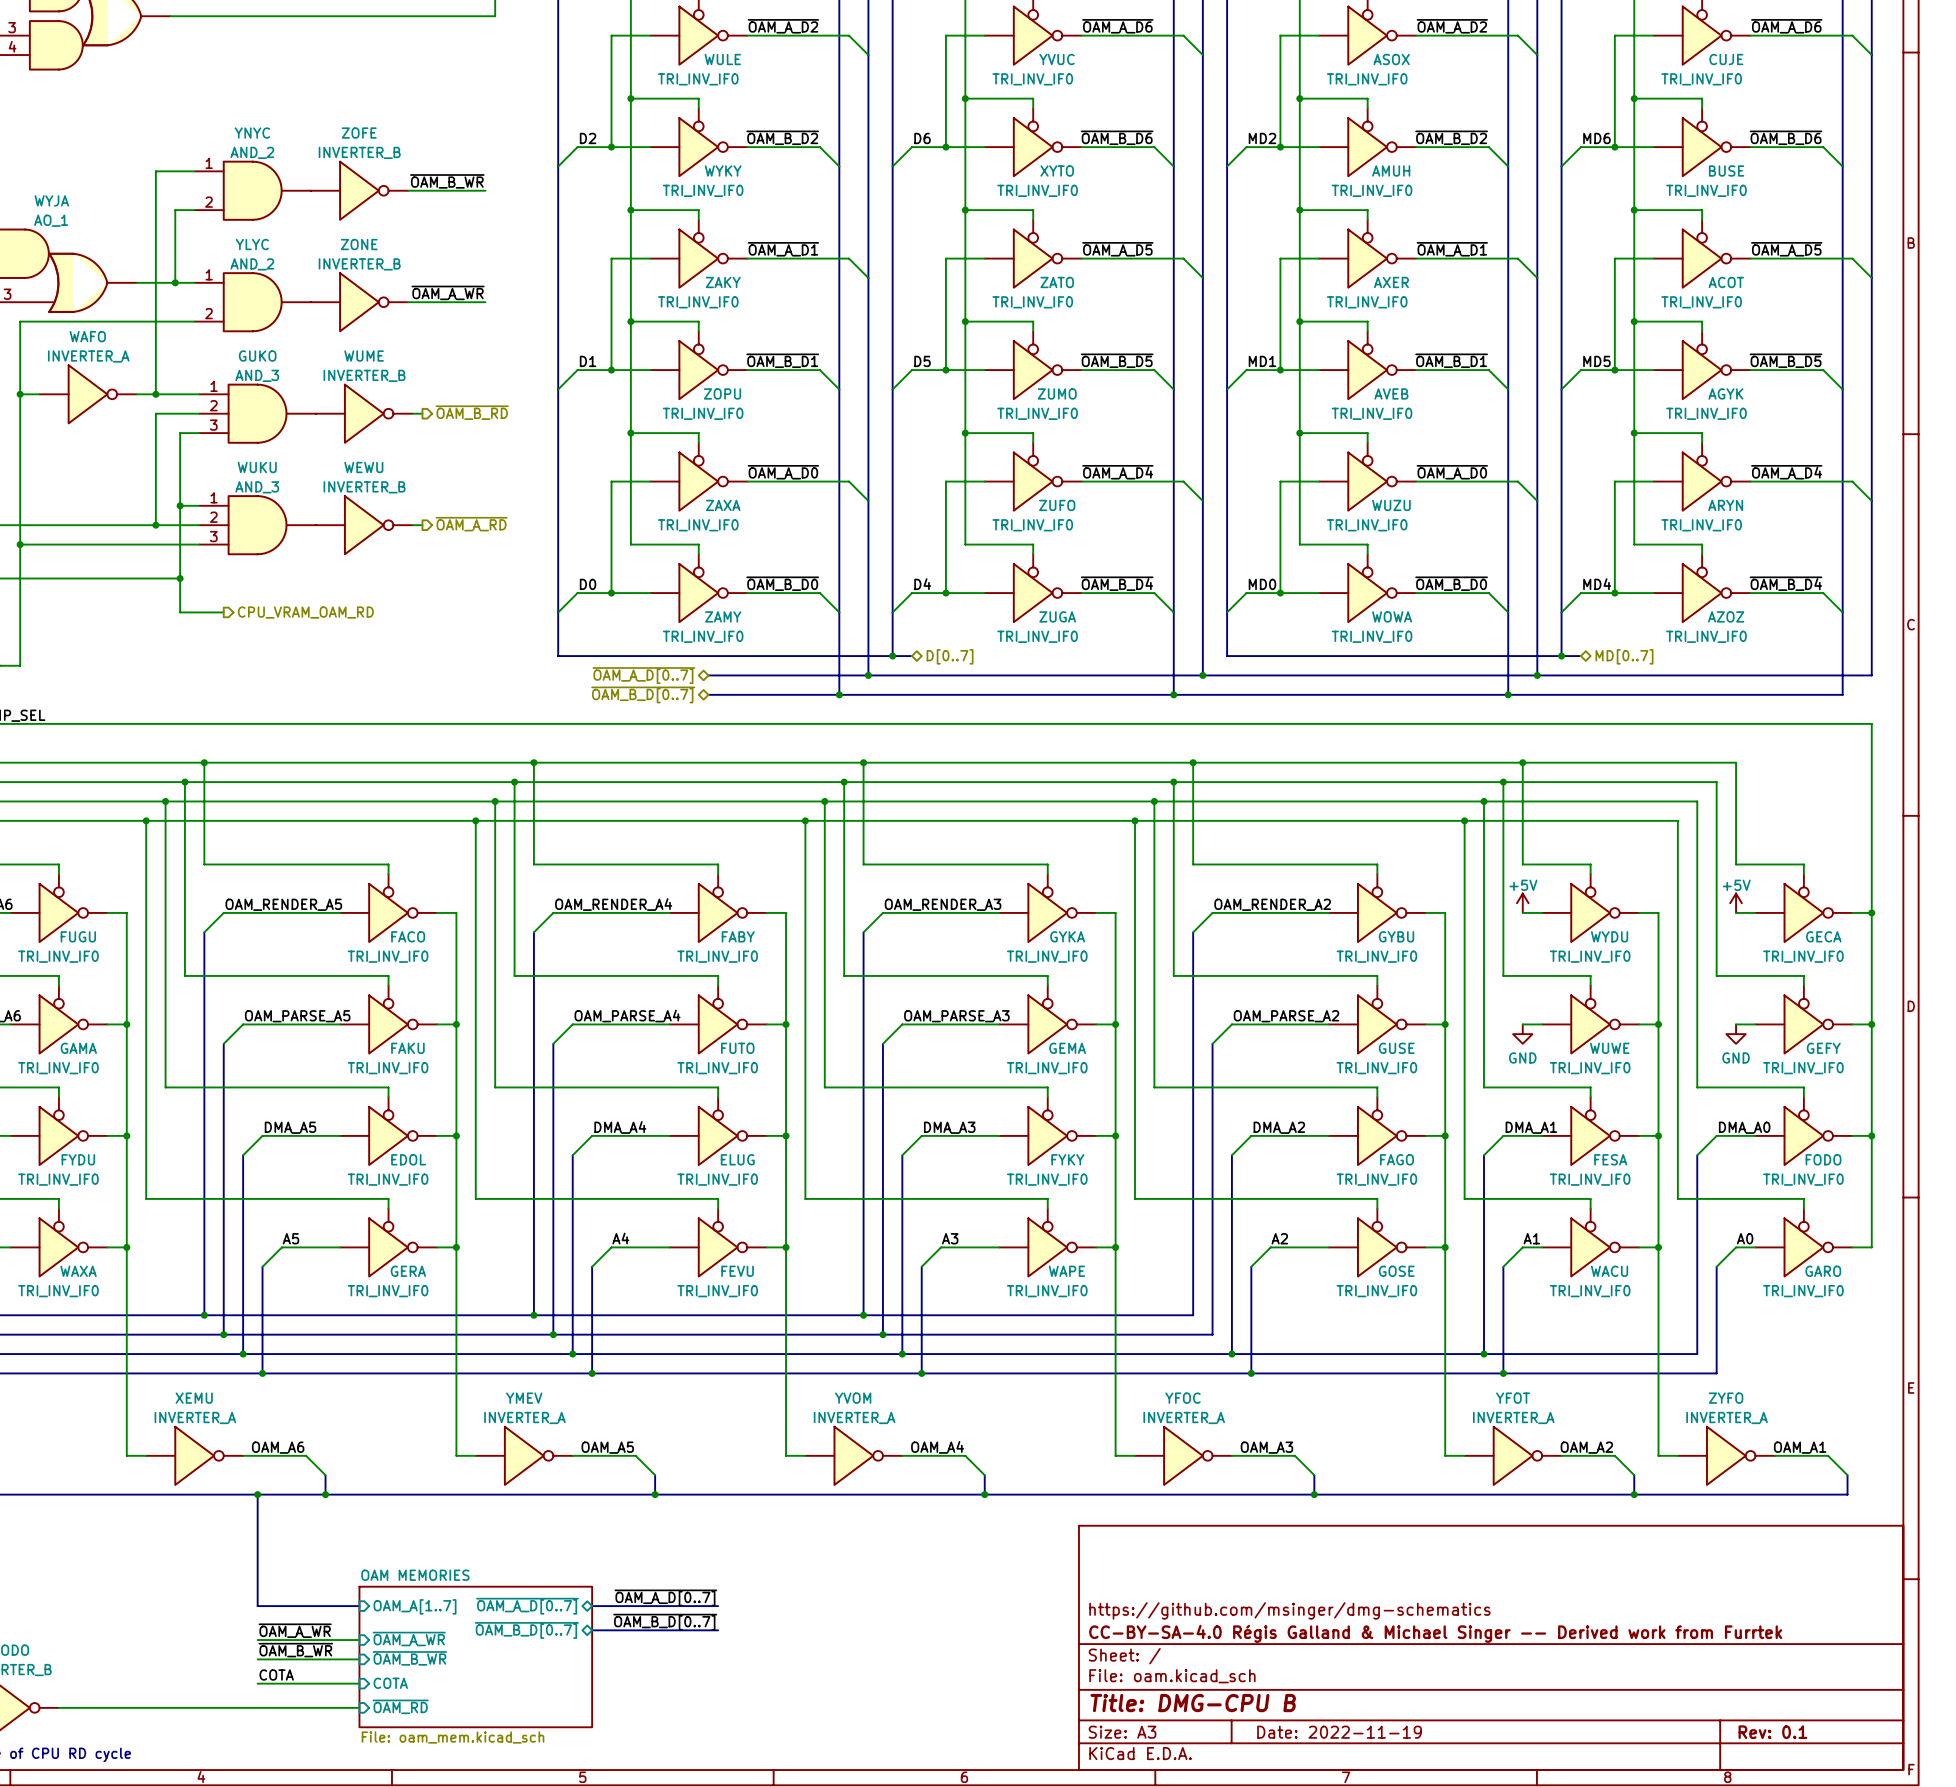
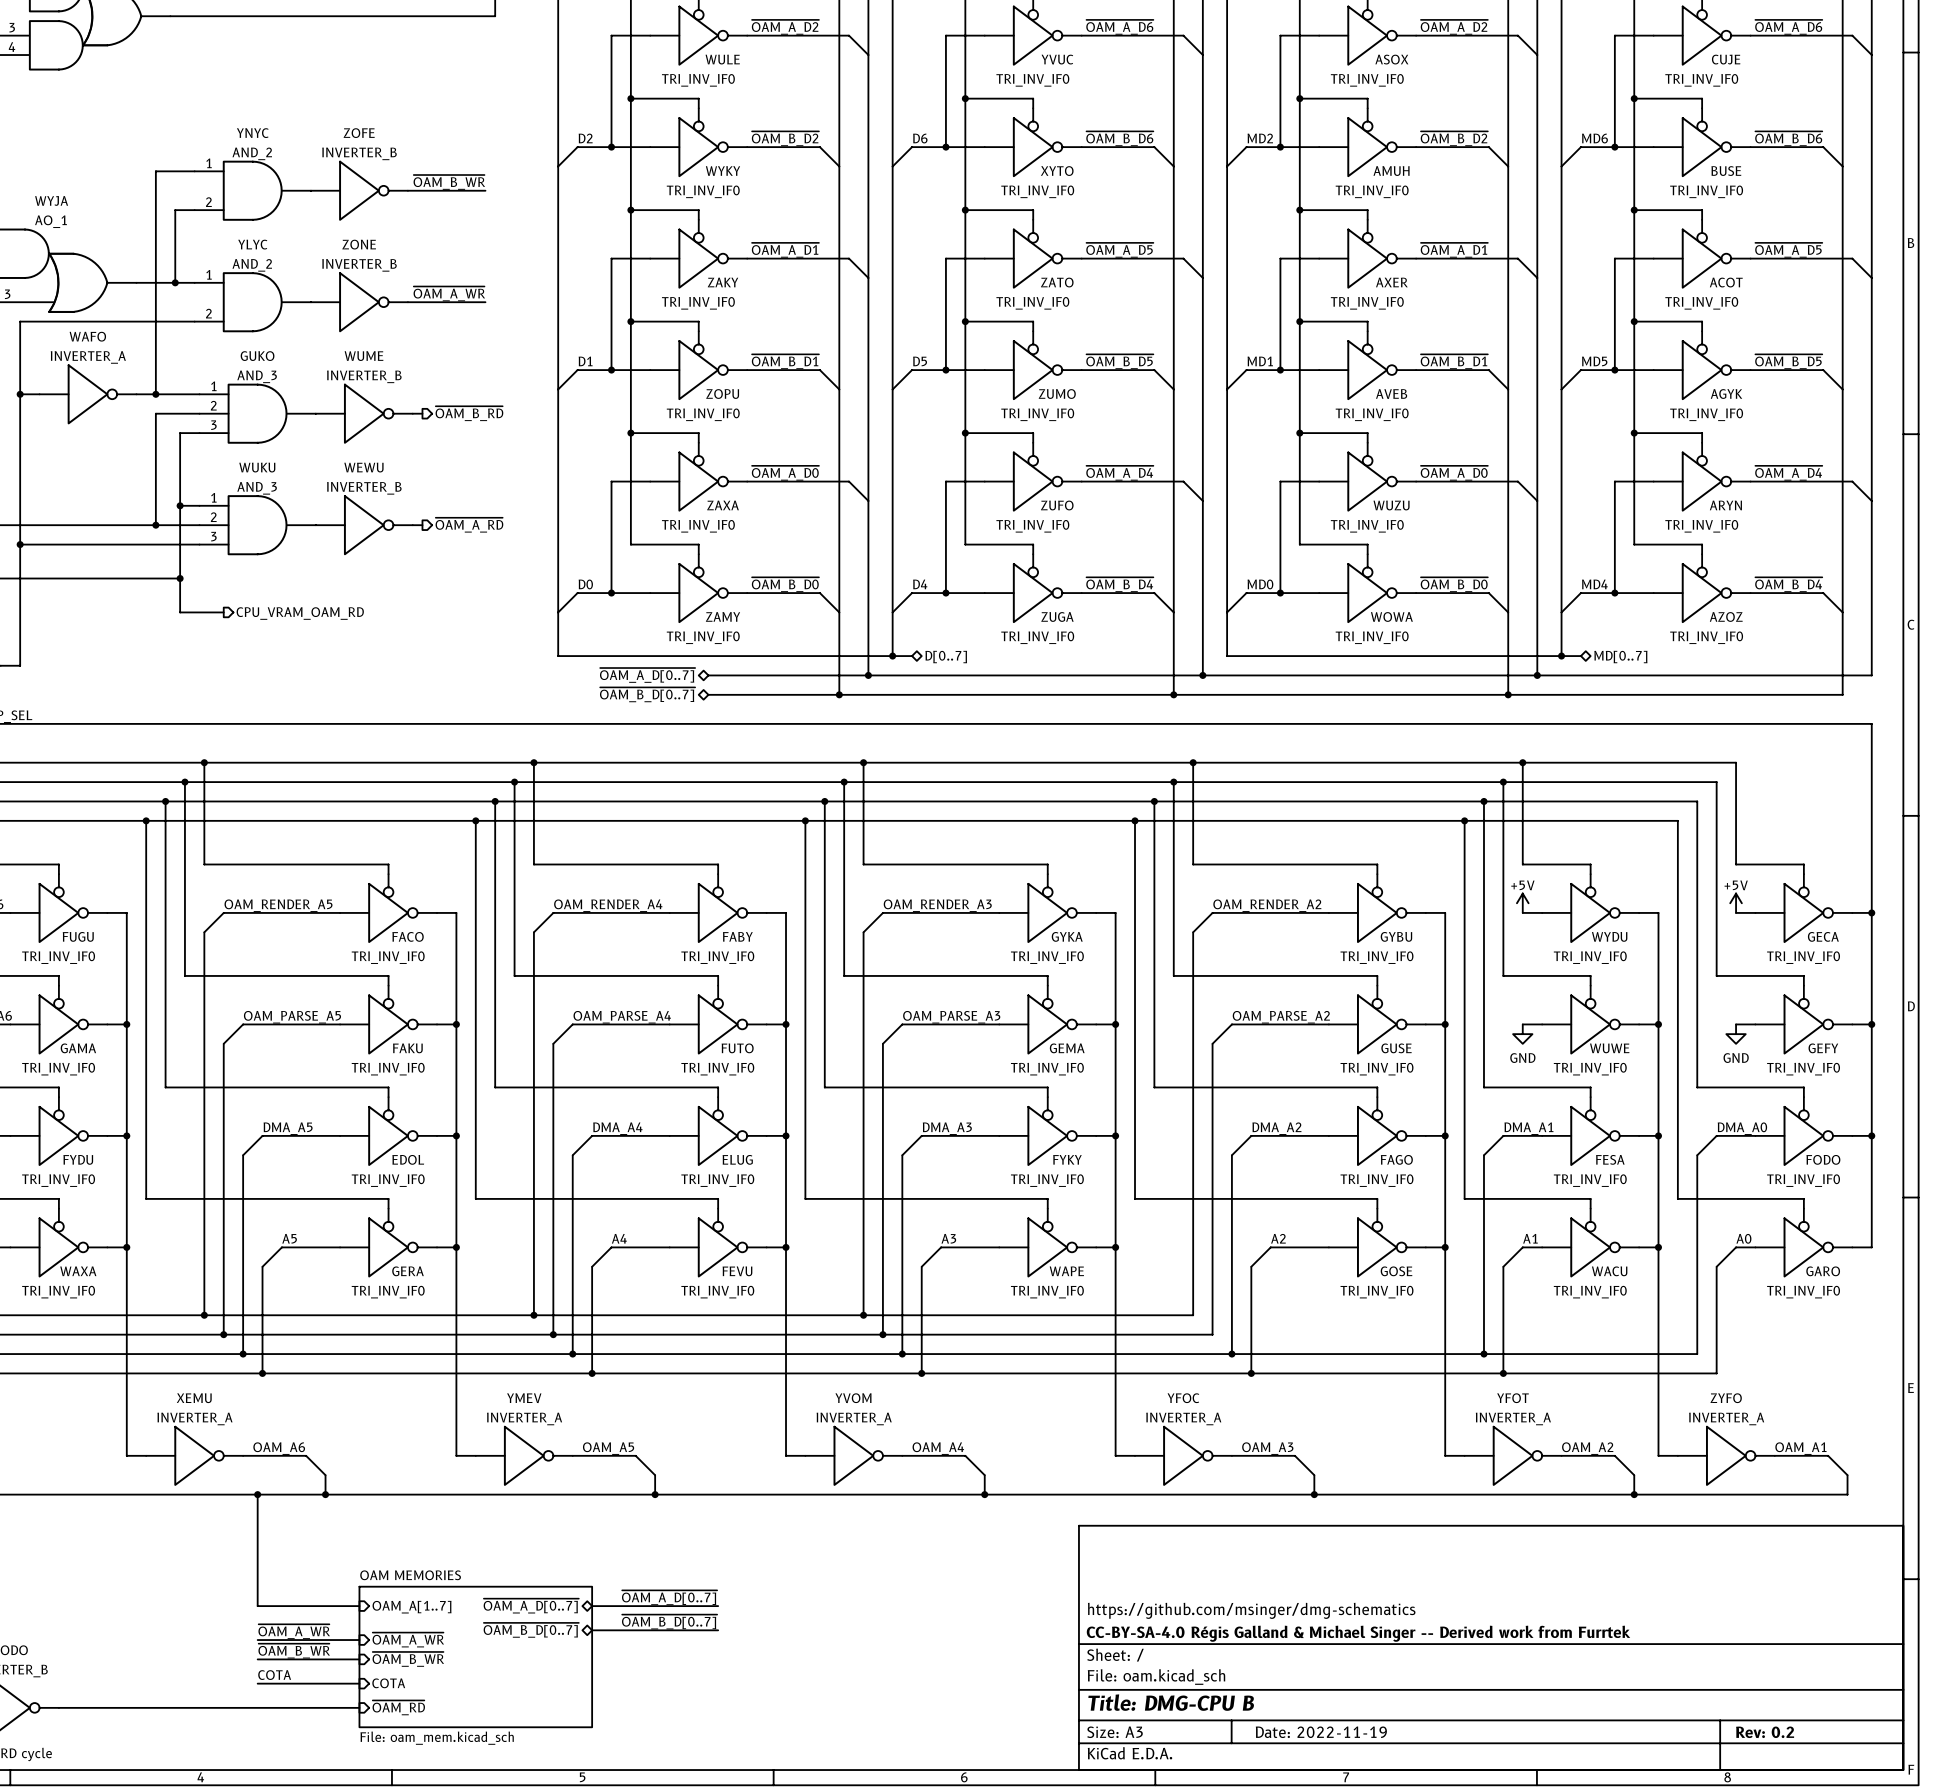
title block: Rev: 0.1 (1772, 1732) -> Rev: 0.2 (1765, 1732)

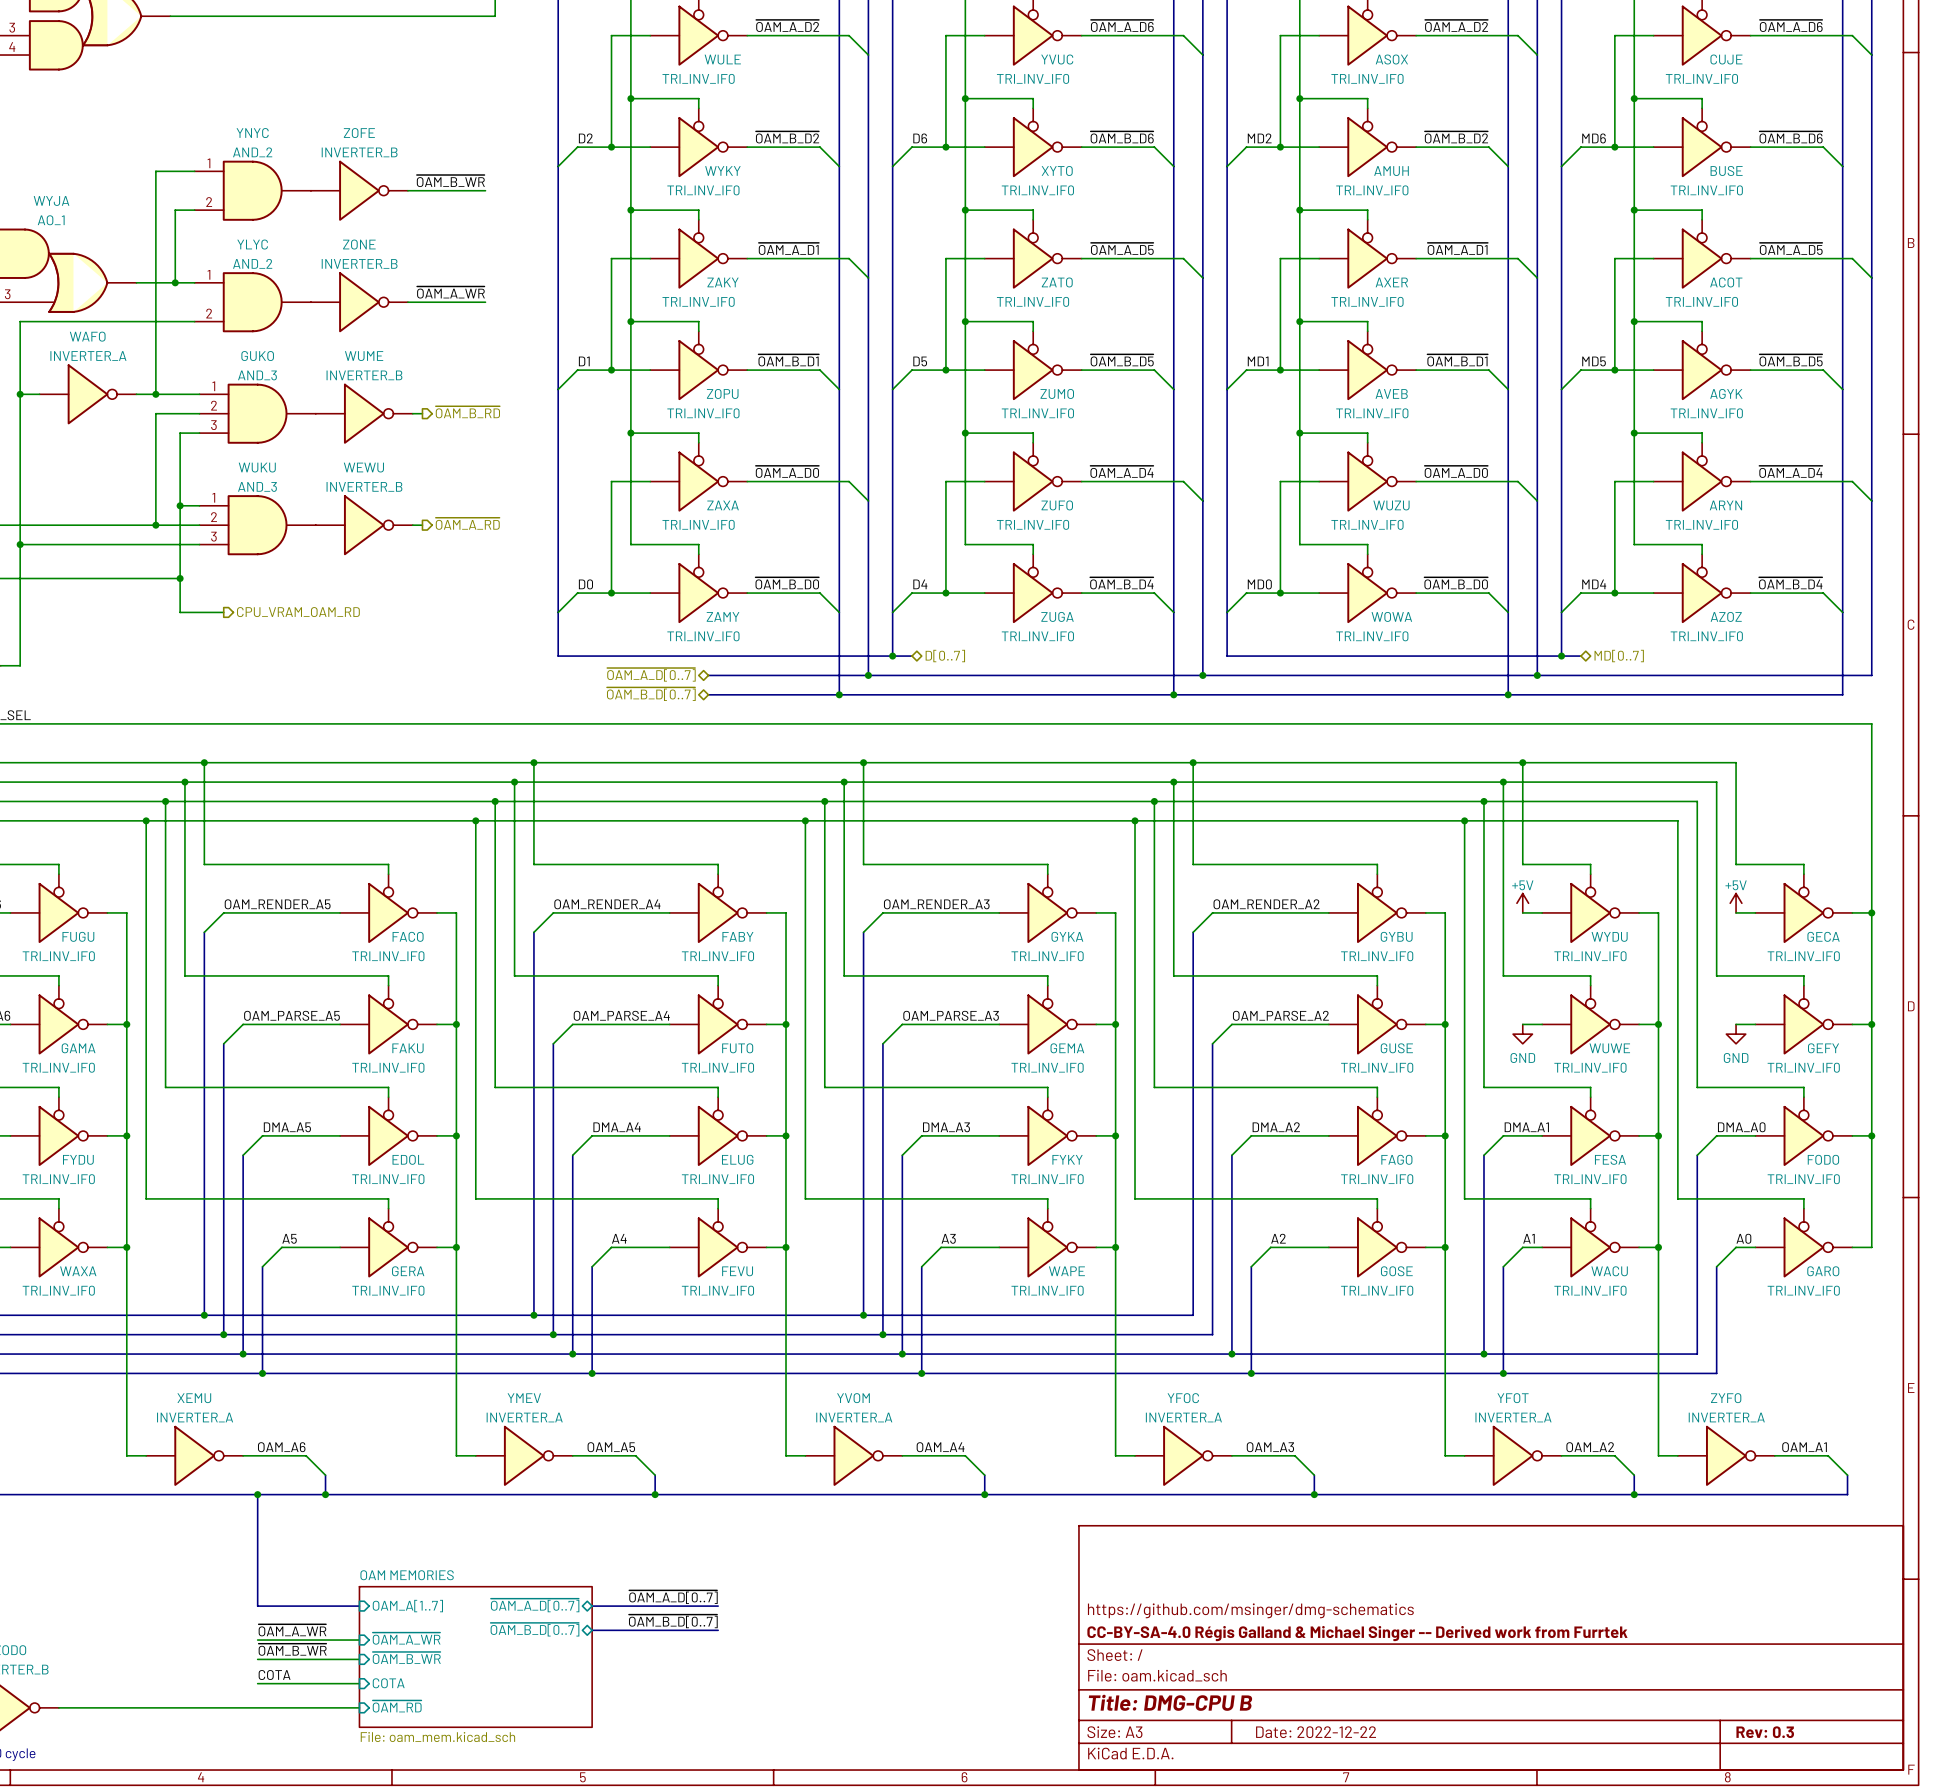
title block: Date: 2022-11-19 (1321, 1732) -> Date: 2022-12-22 (1316, 1732)
title block: Rev: 0.2 (1765, 1732) -> Rev: 0.3 (1765, 1732)

